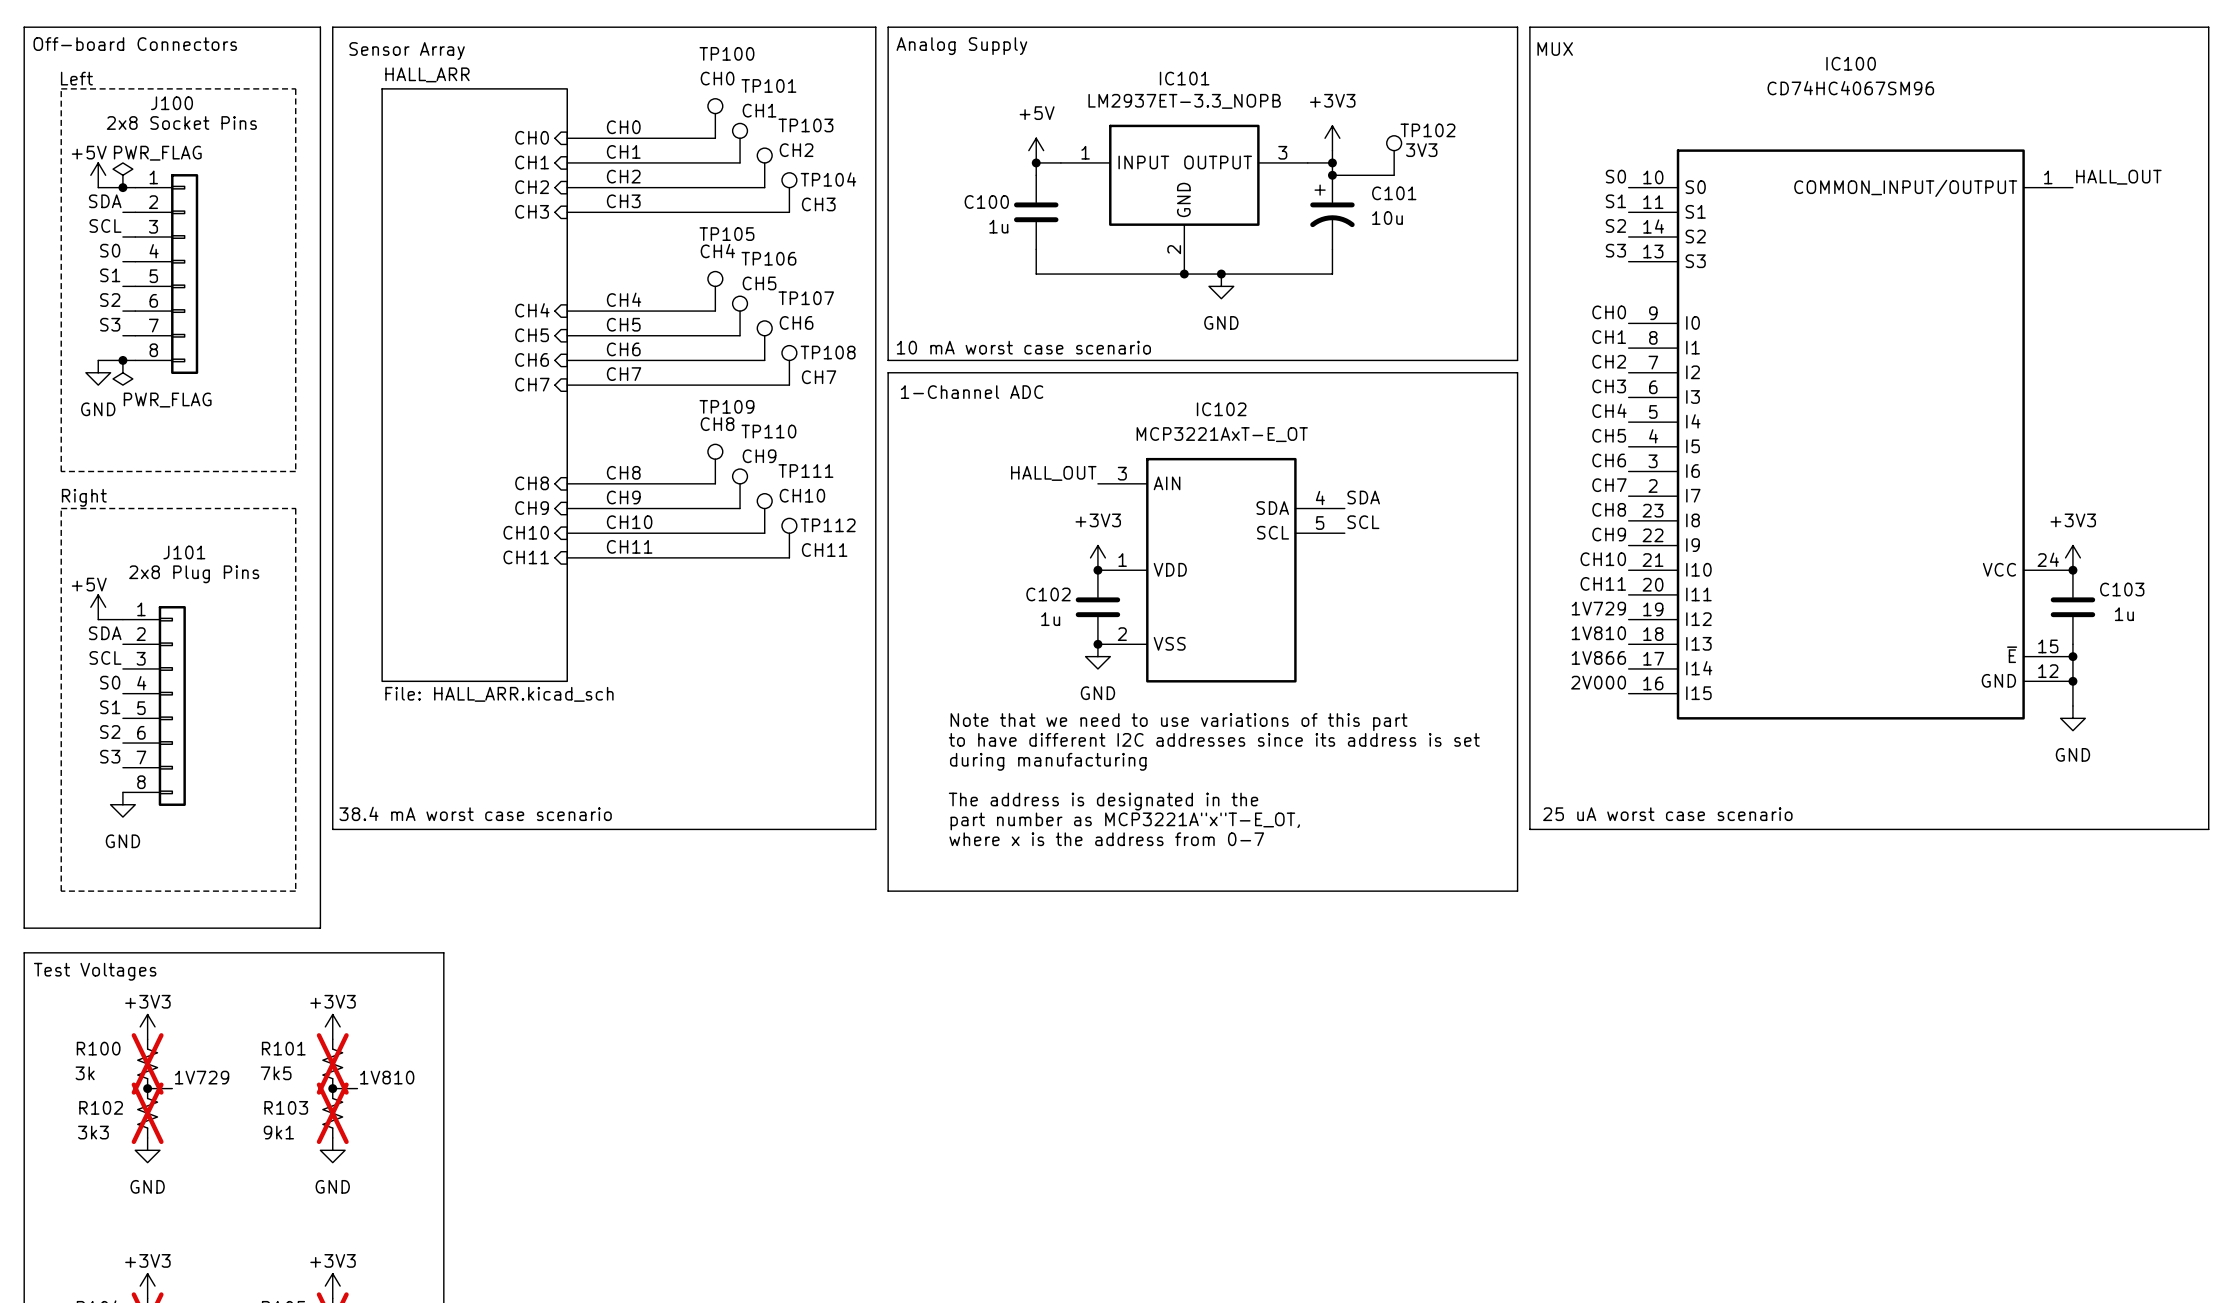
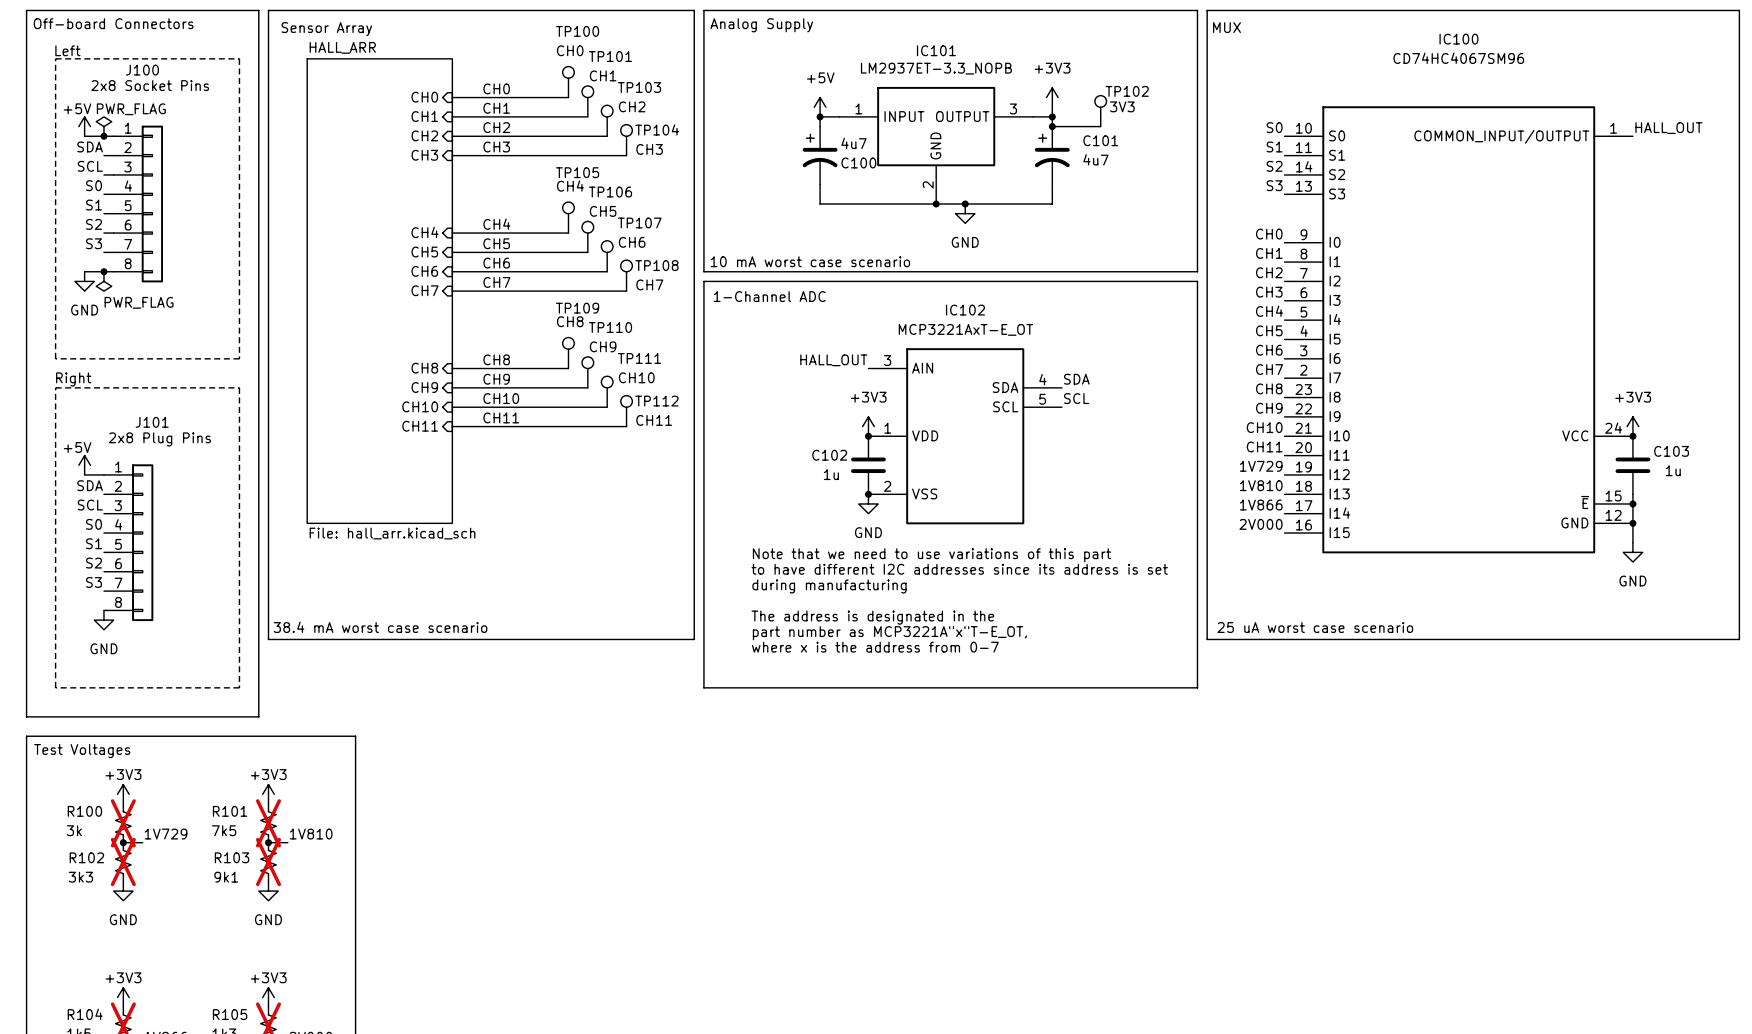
C100 symbol: [1014, 175, 1059, 250] -> [802, 126, 838, 185]
C100 name position: C100 (986, 201) -> C100 (858, 163)
C101 value: 10u (1387, 218) -> 4u7 (1095, 159)
C100 value: 1u (998, 226) -> 4u7 (854, 143)
sheet HALL_ARR value: File: HALL_ARR.kicad_sch (499, 694) -> File: hall_arr.kicad_sch (392, 533)

